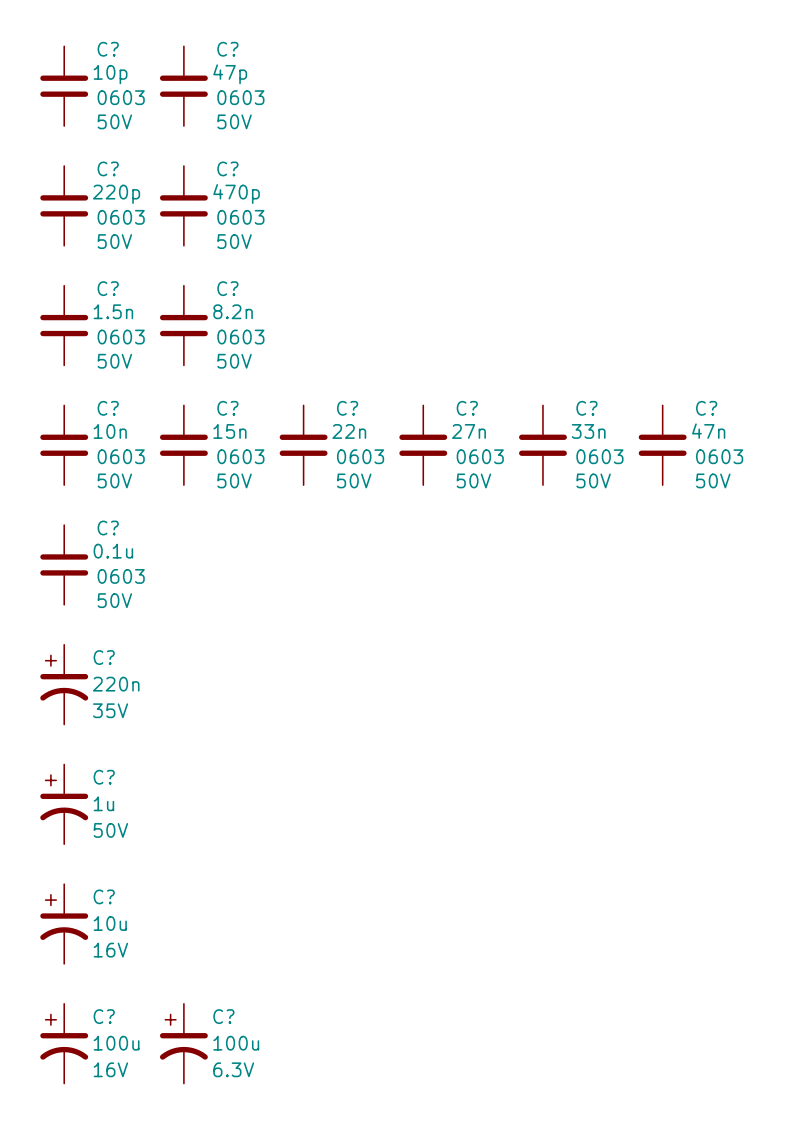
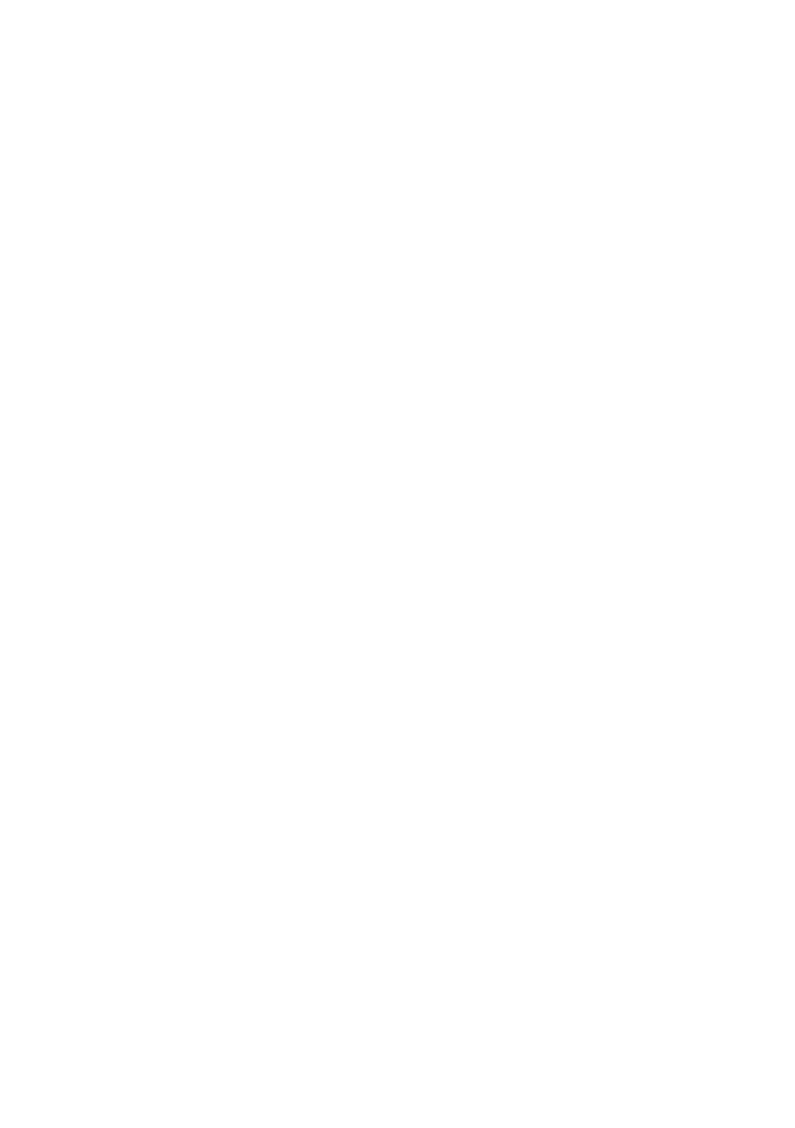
C?: 10p (64, 86) -> none
C?: 47p (183, 86) -> none
C?: 220p (64, 205) -> none
C?: 470p (183, 205) -> none
C?: 1.5n (64, 325) -> none
C?: 8.2n (183, 325) -> none
C?: 10n (64, 445) -> none
C?: 15n (183, 445) -> none
C?: 22n (303, 445) -> none
C?: 27n (423, 445) -> none
C?: 33n (542, 445) -> none
C?: 47n (662, 445) -> none
C?: 0.1u (64, 564) -> none
C?: 220n (64, 684) -> none
C?: 1u (64, 804) -> none
C?: 10u (64, 924) -> none
C?: 100u (64, 1043) -> none
C?: 100u (183, 1043) -> none

